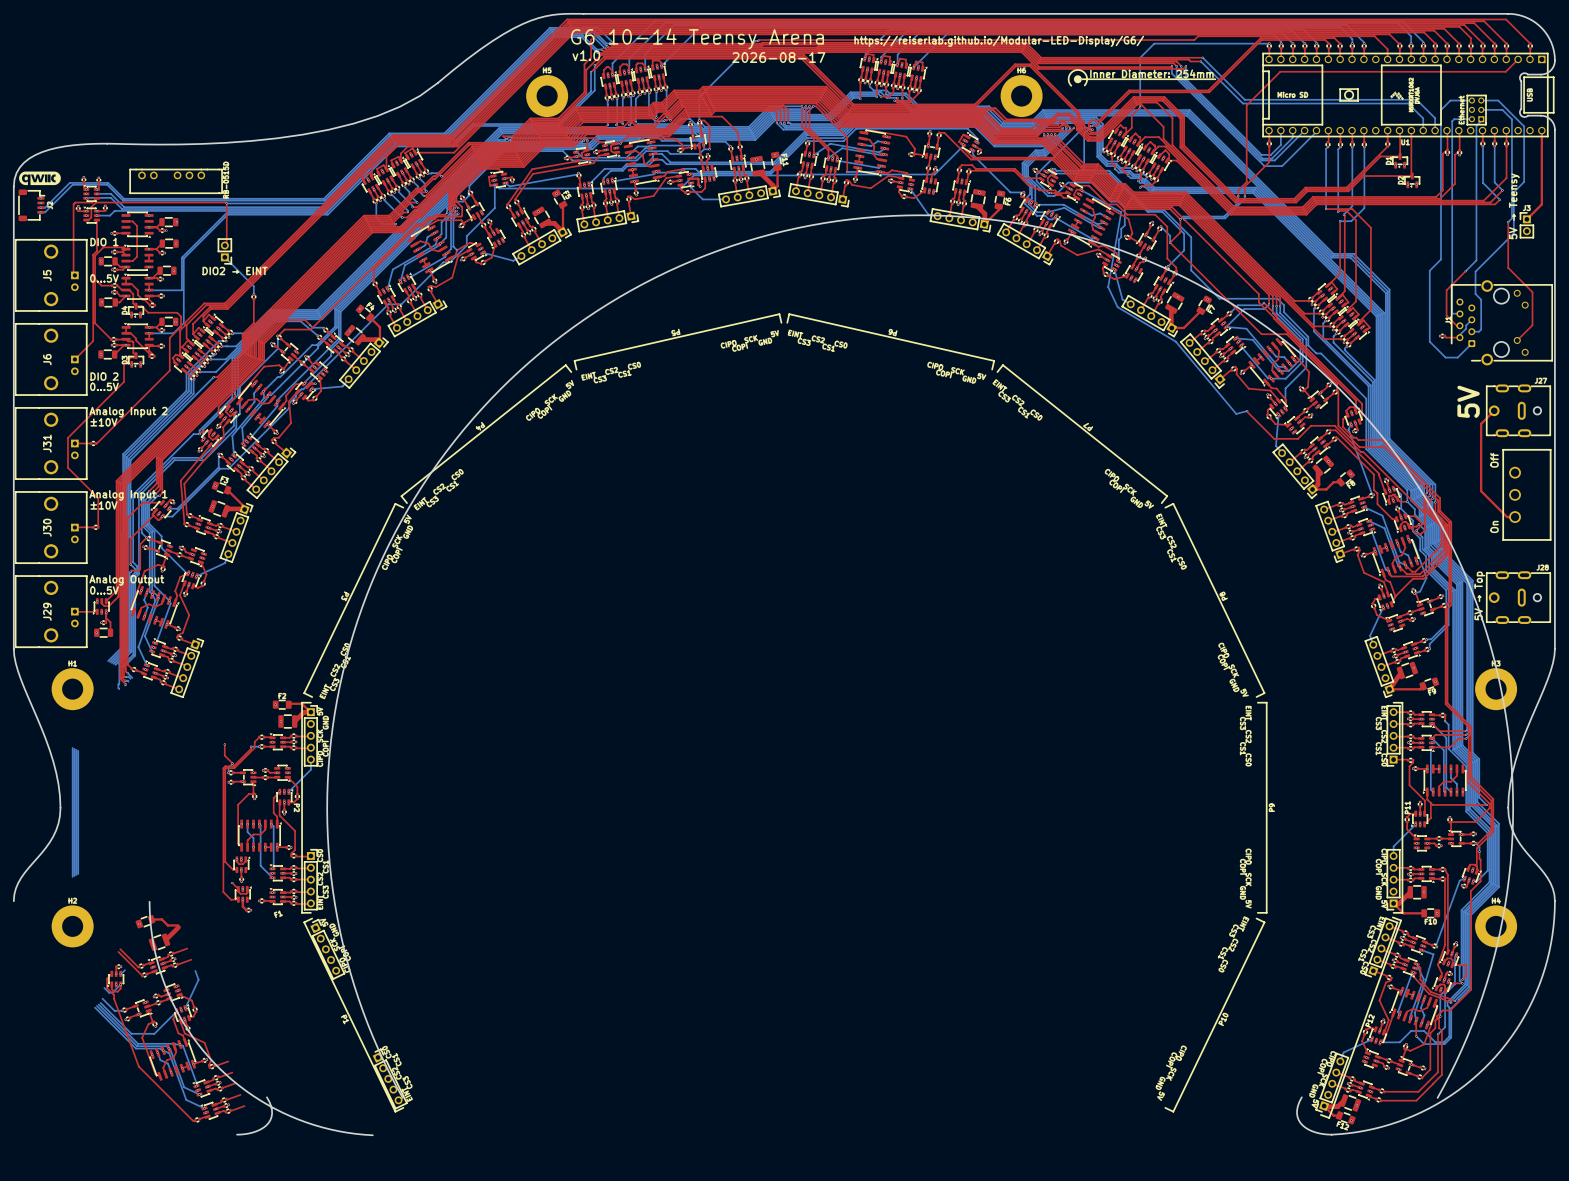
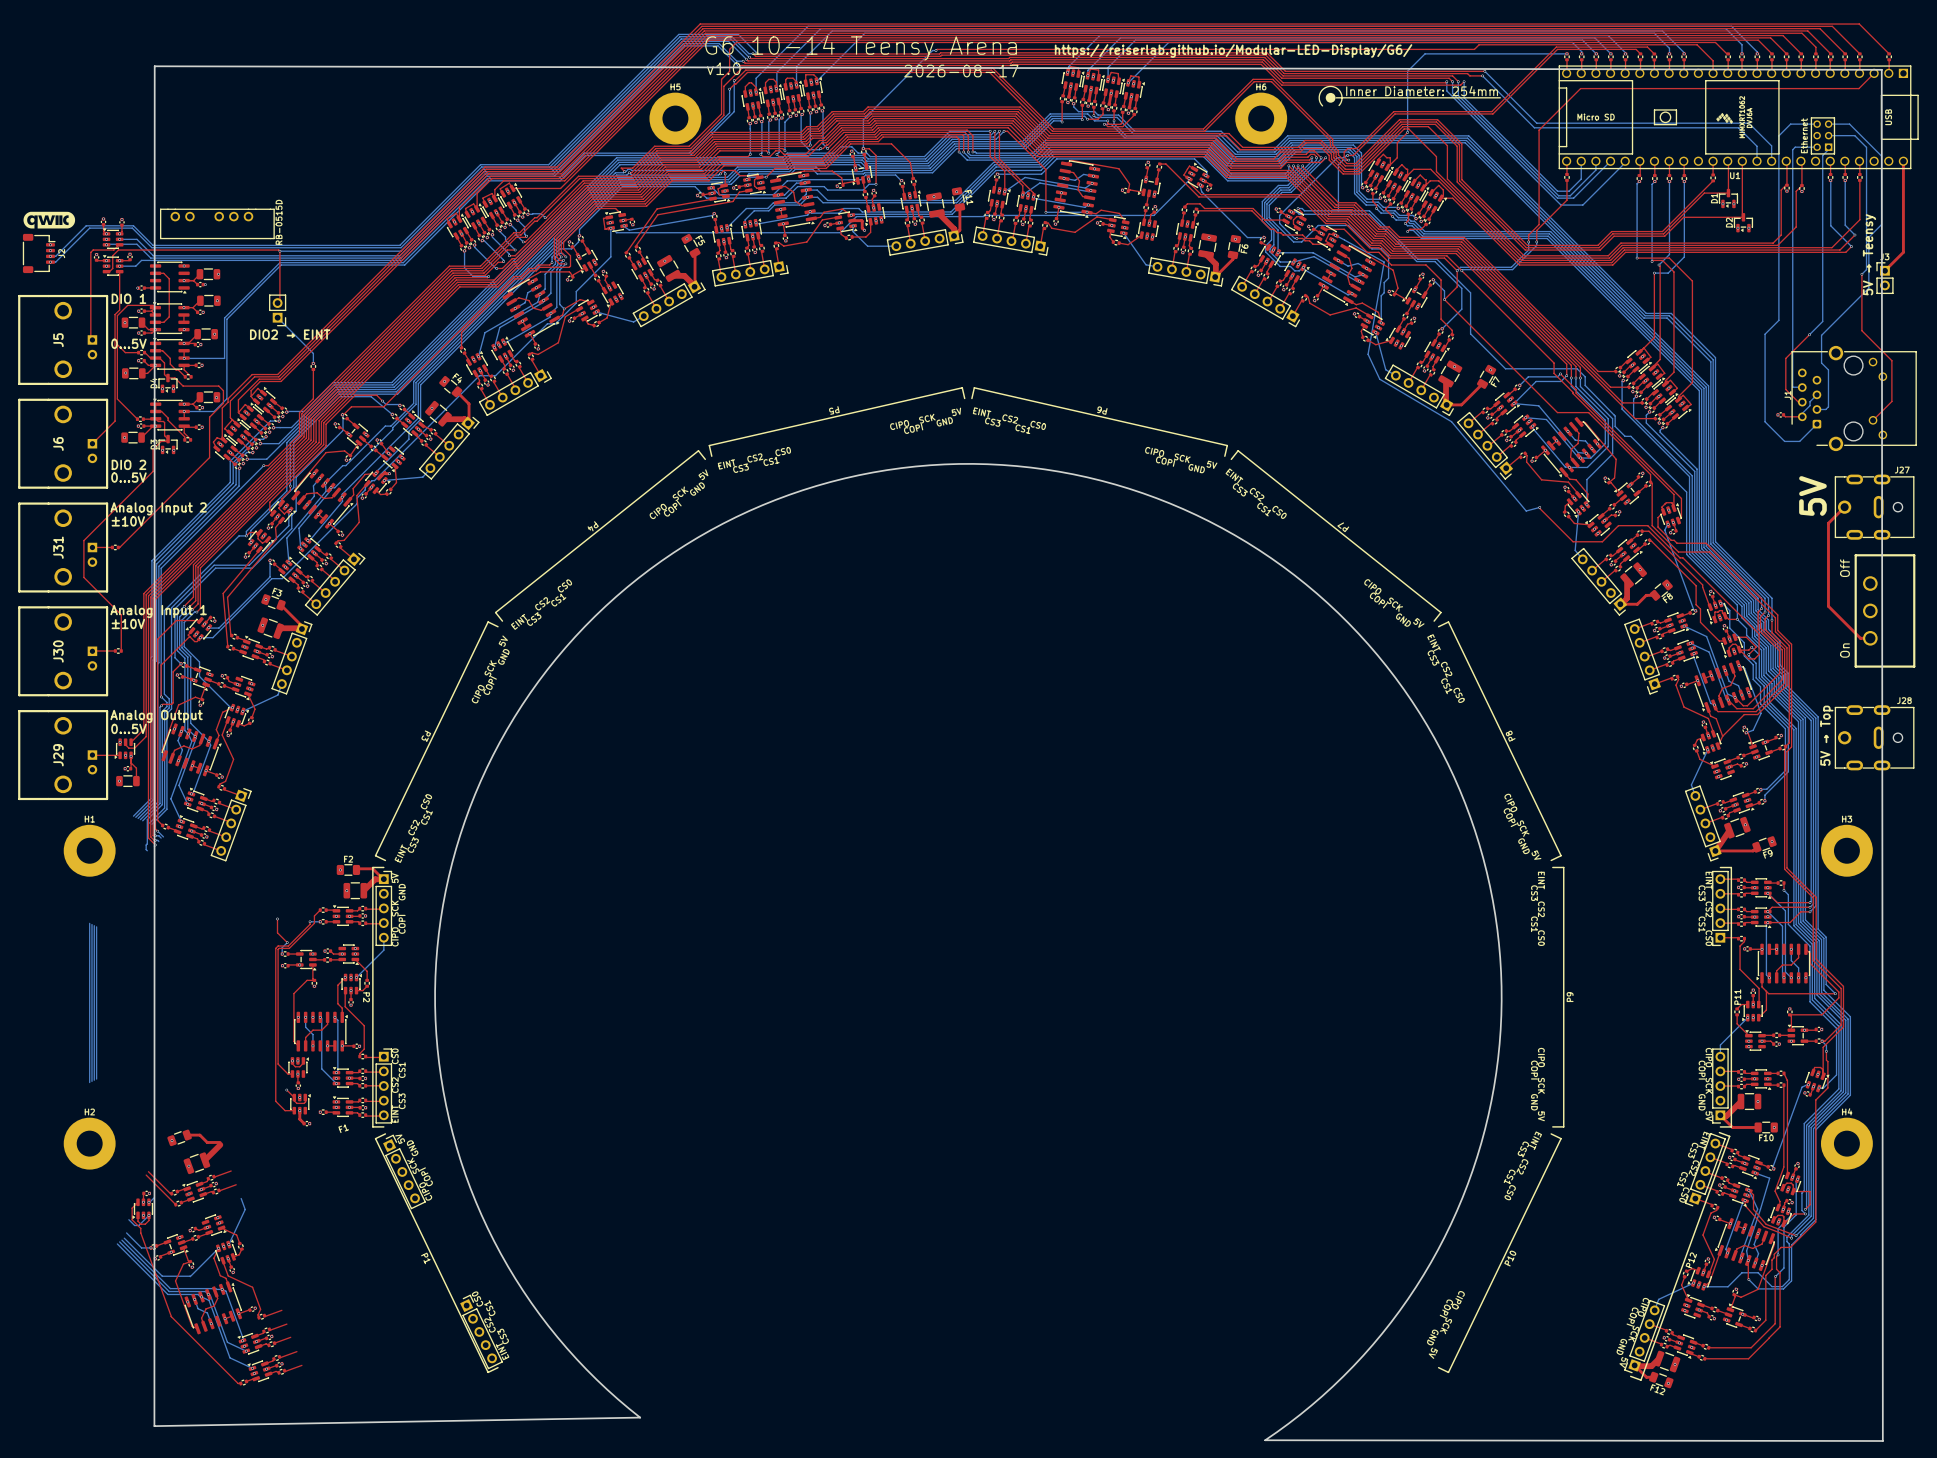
board edge: none -> (154, 66) (154, 1426) (640, 1417) (607, 1389) (576, 1359) (531, 1302) (508, 1266) (487, 1228) (470, 1188) (456, 1147) (446, 1105) (439, 1063) (435, 991) (437, 947) (443, 904) (452, 862) (464, 821) (480, 781) (499, 742) (522, 705) (547, 669) (575, 636) (605, 606) (661, 560) (697, 537) (736, 517) (775, 499) (816, 485) (887, 470) (930, 465) (973, 463) (1016, 466) (1059, 471) (1129, 488) (1170, 503) (1209, 521) (1247, 542) (1283, 566) (1316, 593) (1348, 623) (1377, 655) (1403, 689) (1427, 725) (1447, 763) (1465, 803) (1479, 844) (1490, 886) (1497, 928) (1501, 972) (1501, 1015) (1498, 1058) (1491, 1101) (1481, 1143) (1467, 1184) (1450, 1224) (1430, 1262) (1407, 1299) (1382, 1333) (1332, 1386) (1300, 1414) (1265, 1440) (1882, 1441) (1881, 69) (154, 66)
board edge: (13, 901) (15, 888) (21, 878) (53, 836) (58, 823) (60, 807) (58, 784) (53, 761) (18, 671) (13, 648) (13, 186) (16, 173) (29, 158) (49, 149) (72, 145) (202, 143) (251, 141) (302, 134) (353, 123) (399, 106) (420, 95) (480, 49) (513, 28) (538, 18) (558, 14) (1519, 15) (1532, 20) (1543, 30) (1551, 42) (1554, 56) (1553, 65) (1547, 72) (1540, 74) (1524, 73) (1520, 75) (1519, 112) (1523, 116) (1540, 115) (1547, 117) (1553, 122) (1554, 129) (1554, 648) (1550, 671) (1515, 761) (1510, 784) (1508, 807) (1510, 823) (1515, 836) (1544, 873) (1552, 888) (1554, 909) (1551, 943) (1539, 984) (1516, 1029) (1484, 1068) (1444, 1099) (1421, 1112) (1390, 1124) (1365, 1130) (1331, 1134) (1311, 1131) (1300, 1122) (1297, 1110) (1301, 1097) -> none
board edge: (149, 901) (153, 943) (164, 984) (183, 1022) (214, 1063) (246, 1091) (282, 1112) (322, 1127) (372, 1135) -> none
board edge: (266, 1097) (271, 1110) (268, 1122) (257, 1131) (237, 1134) -> none
board edge: (402, 1097) (372, 1036) (346, 958) (331, 877) (327, 809) (331, 740) (346, 659) (372, 582) (408, 508) (454, 440) (500, 389) (551, 343) (619, 297) (693, 260) (770, 234) (851, 219) (920, 215) (1002, 220) (1069, 234) (1147, 260) (1220, 297) (1277, 335) (1339, 389) (1385, 440) (1431, 508) (1462, 569) (1490, 646) (1505, 713) (1513, 795) (1510, 863) (1497, 945) (1472, 1023) (1437, 1097) -> none

